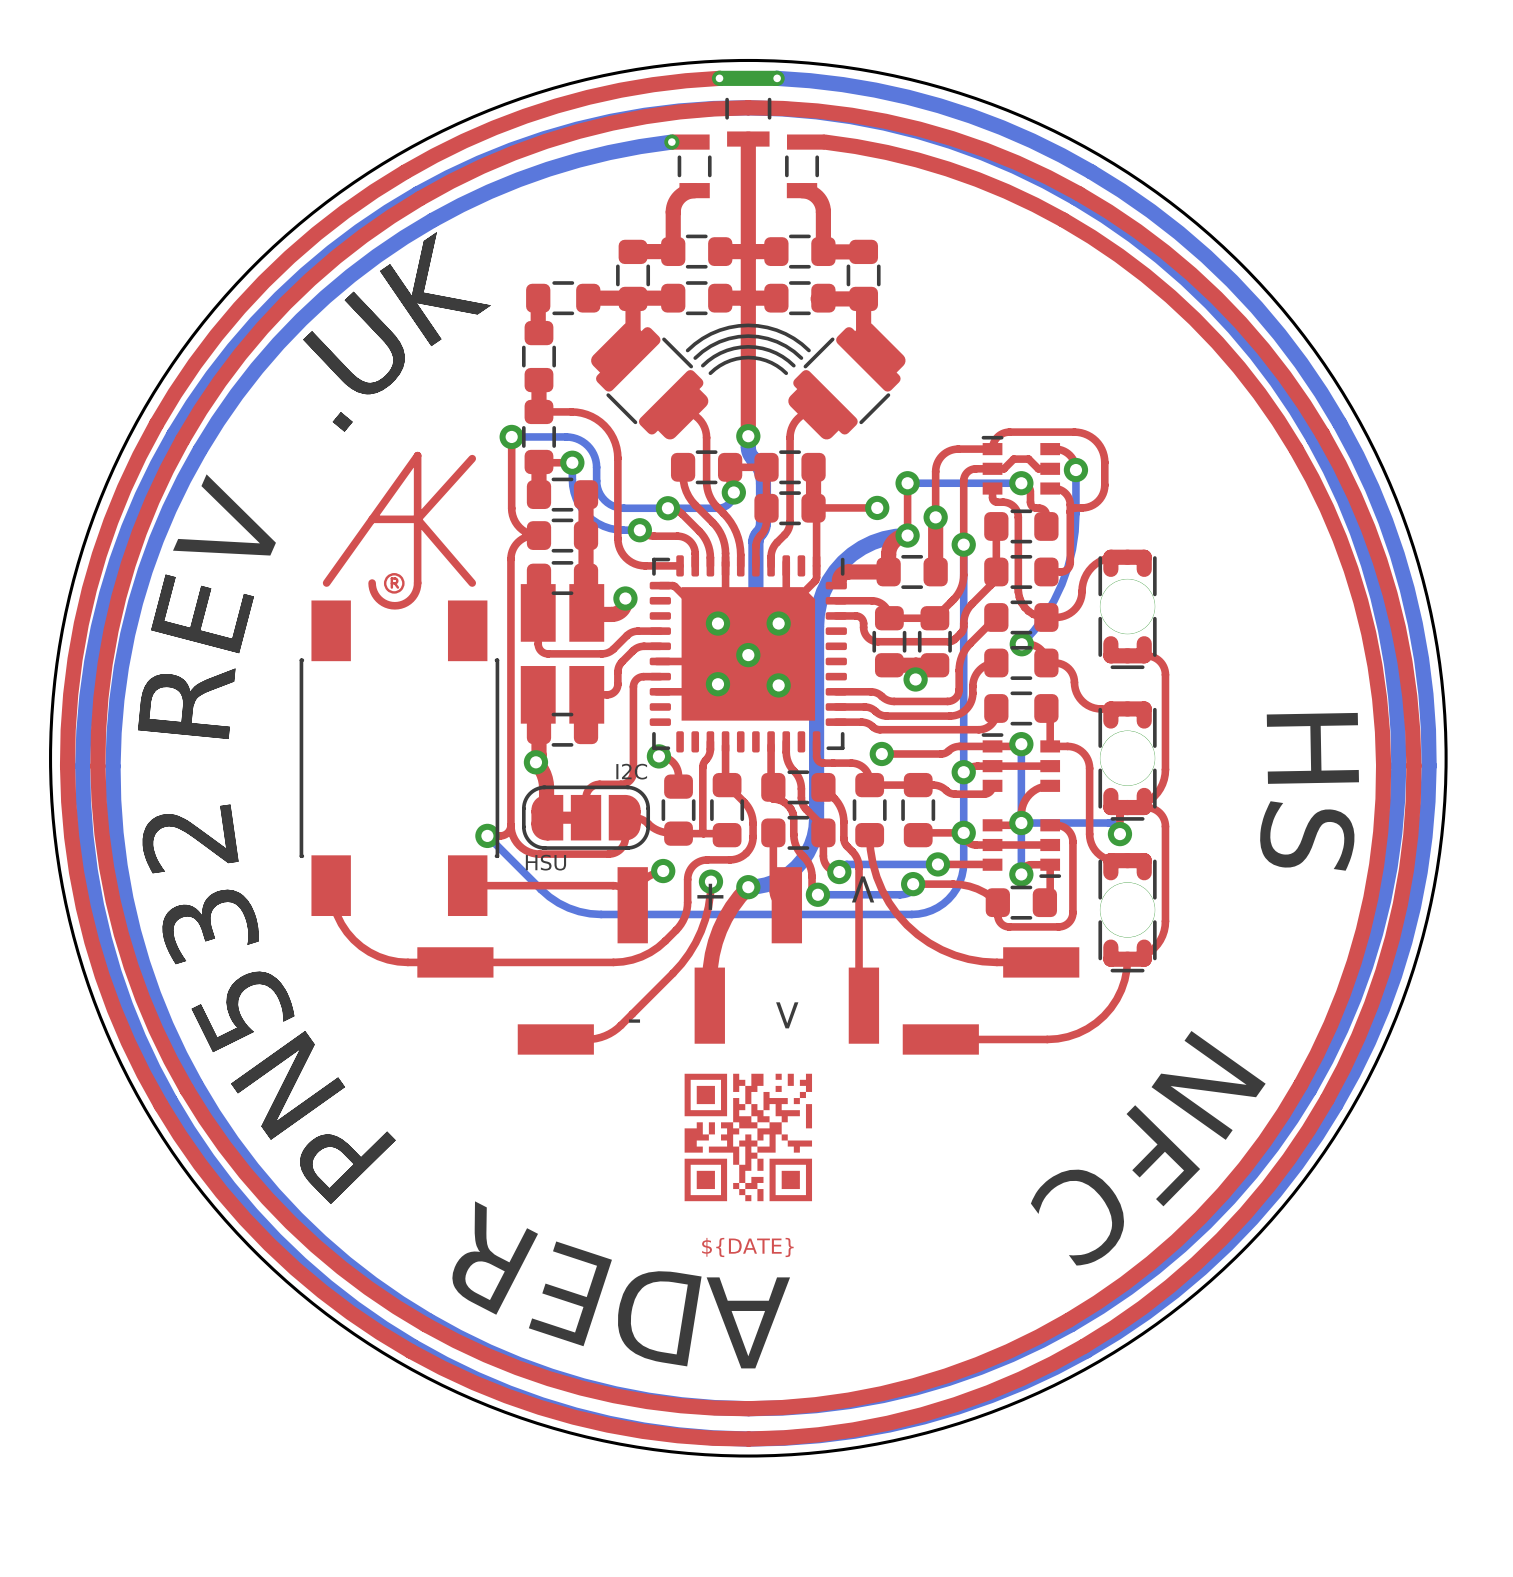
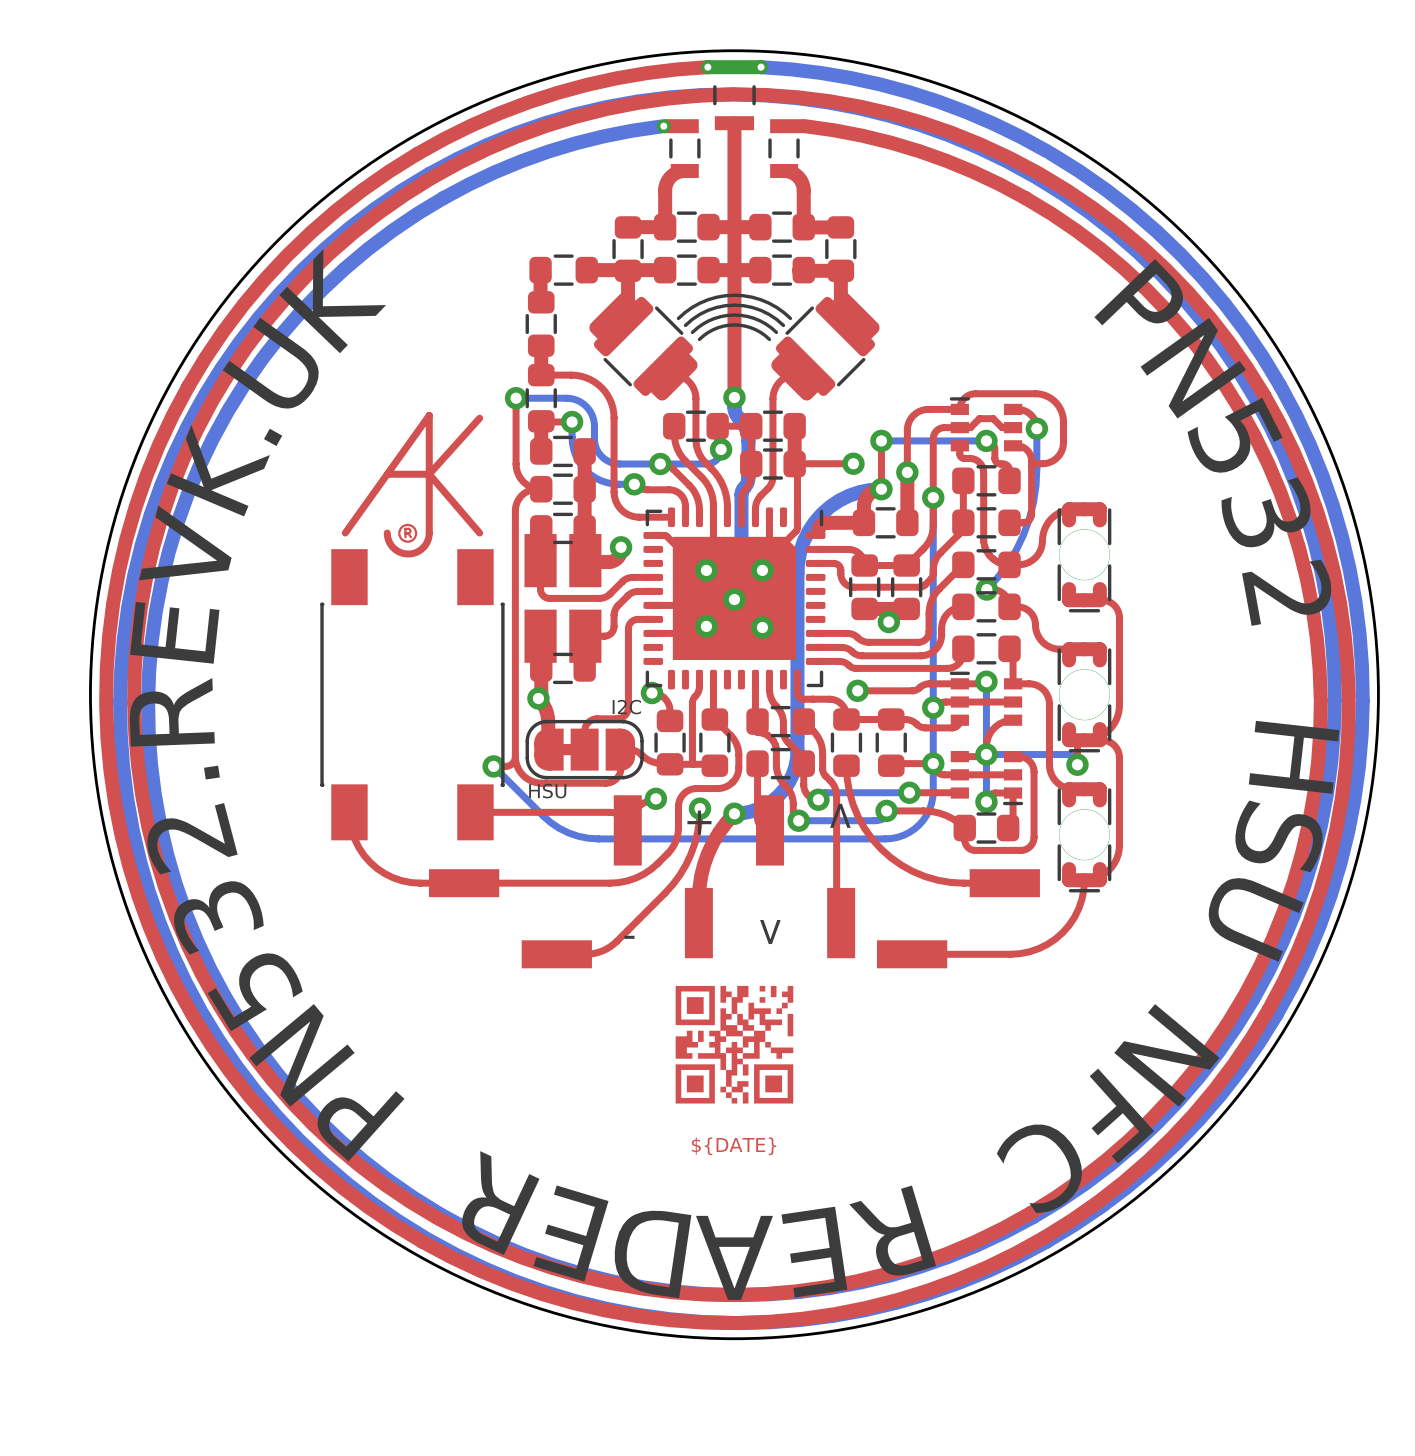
part footprint: [49, 58, 1448, 1458] -> [89, 49, 1380, 1341]

